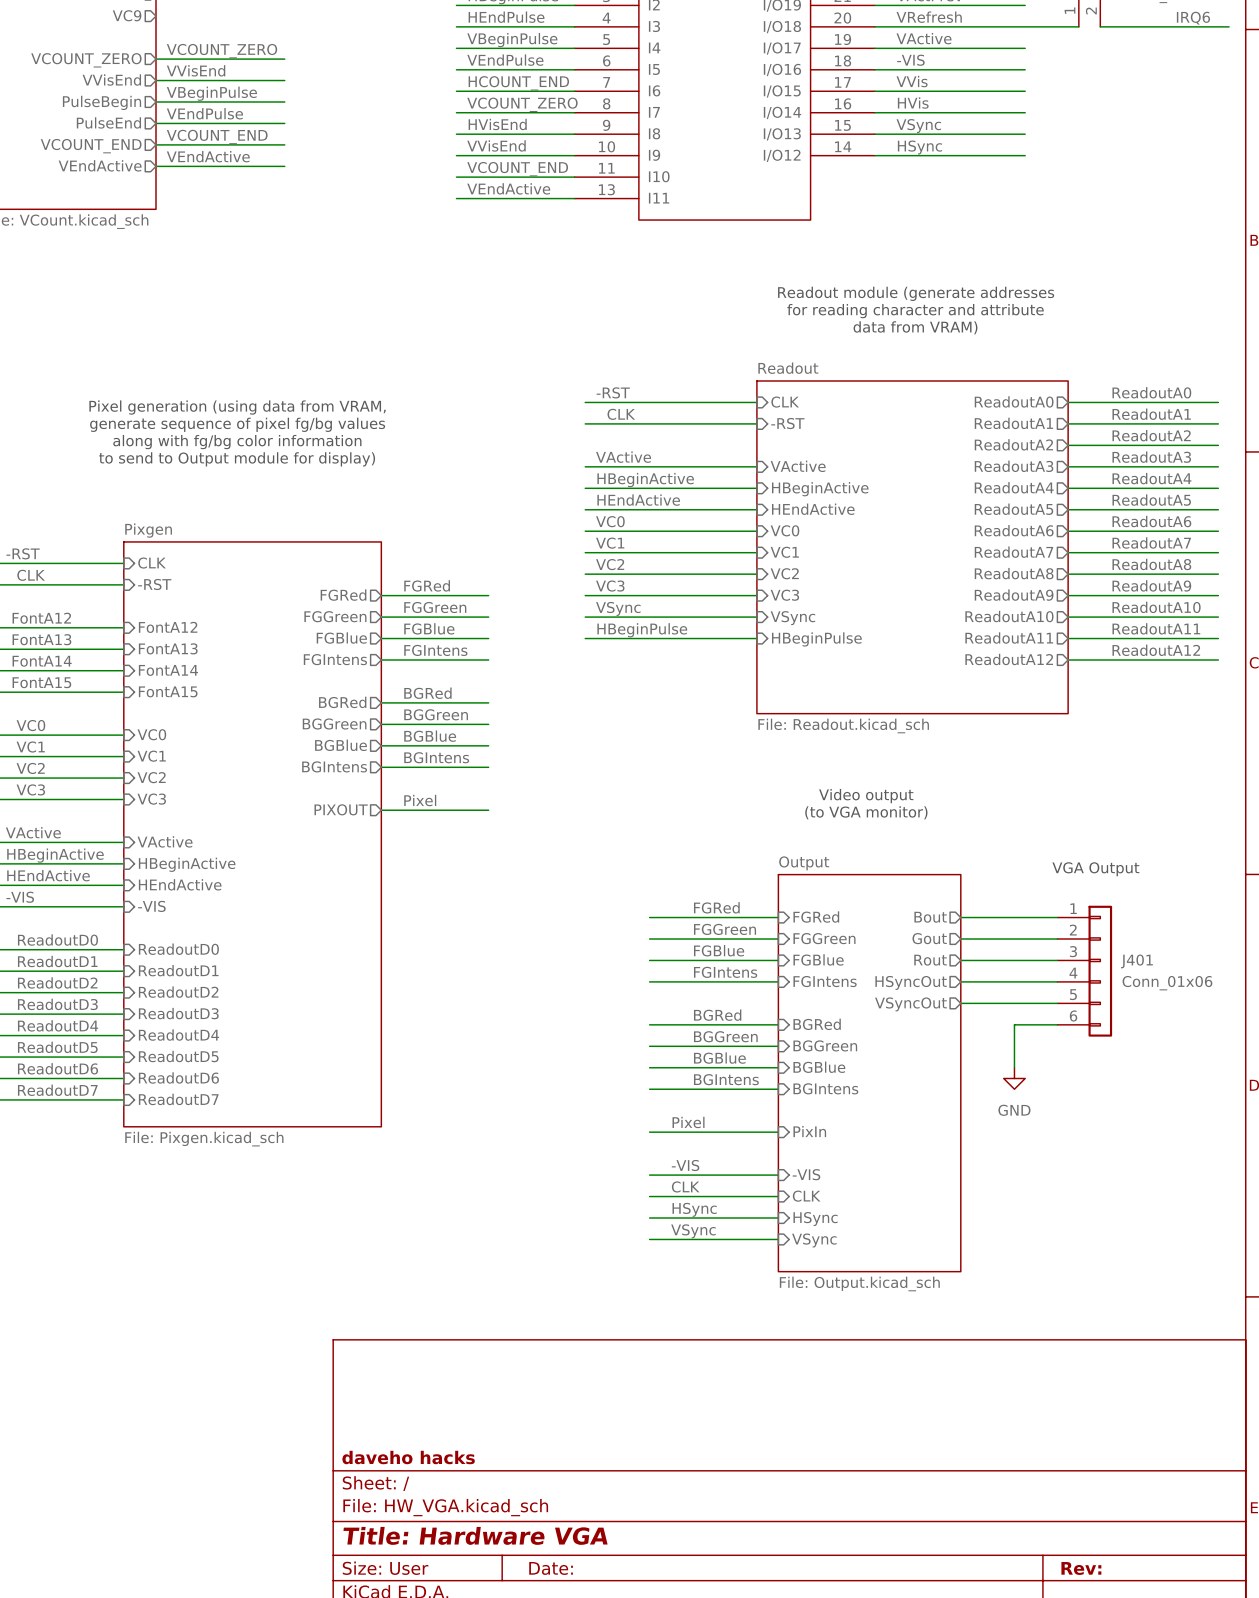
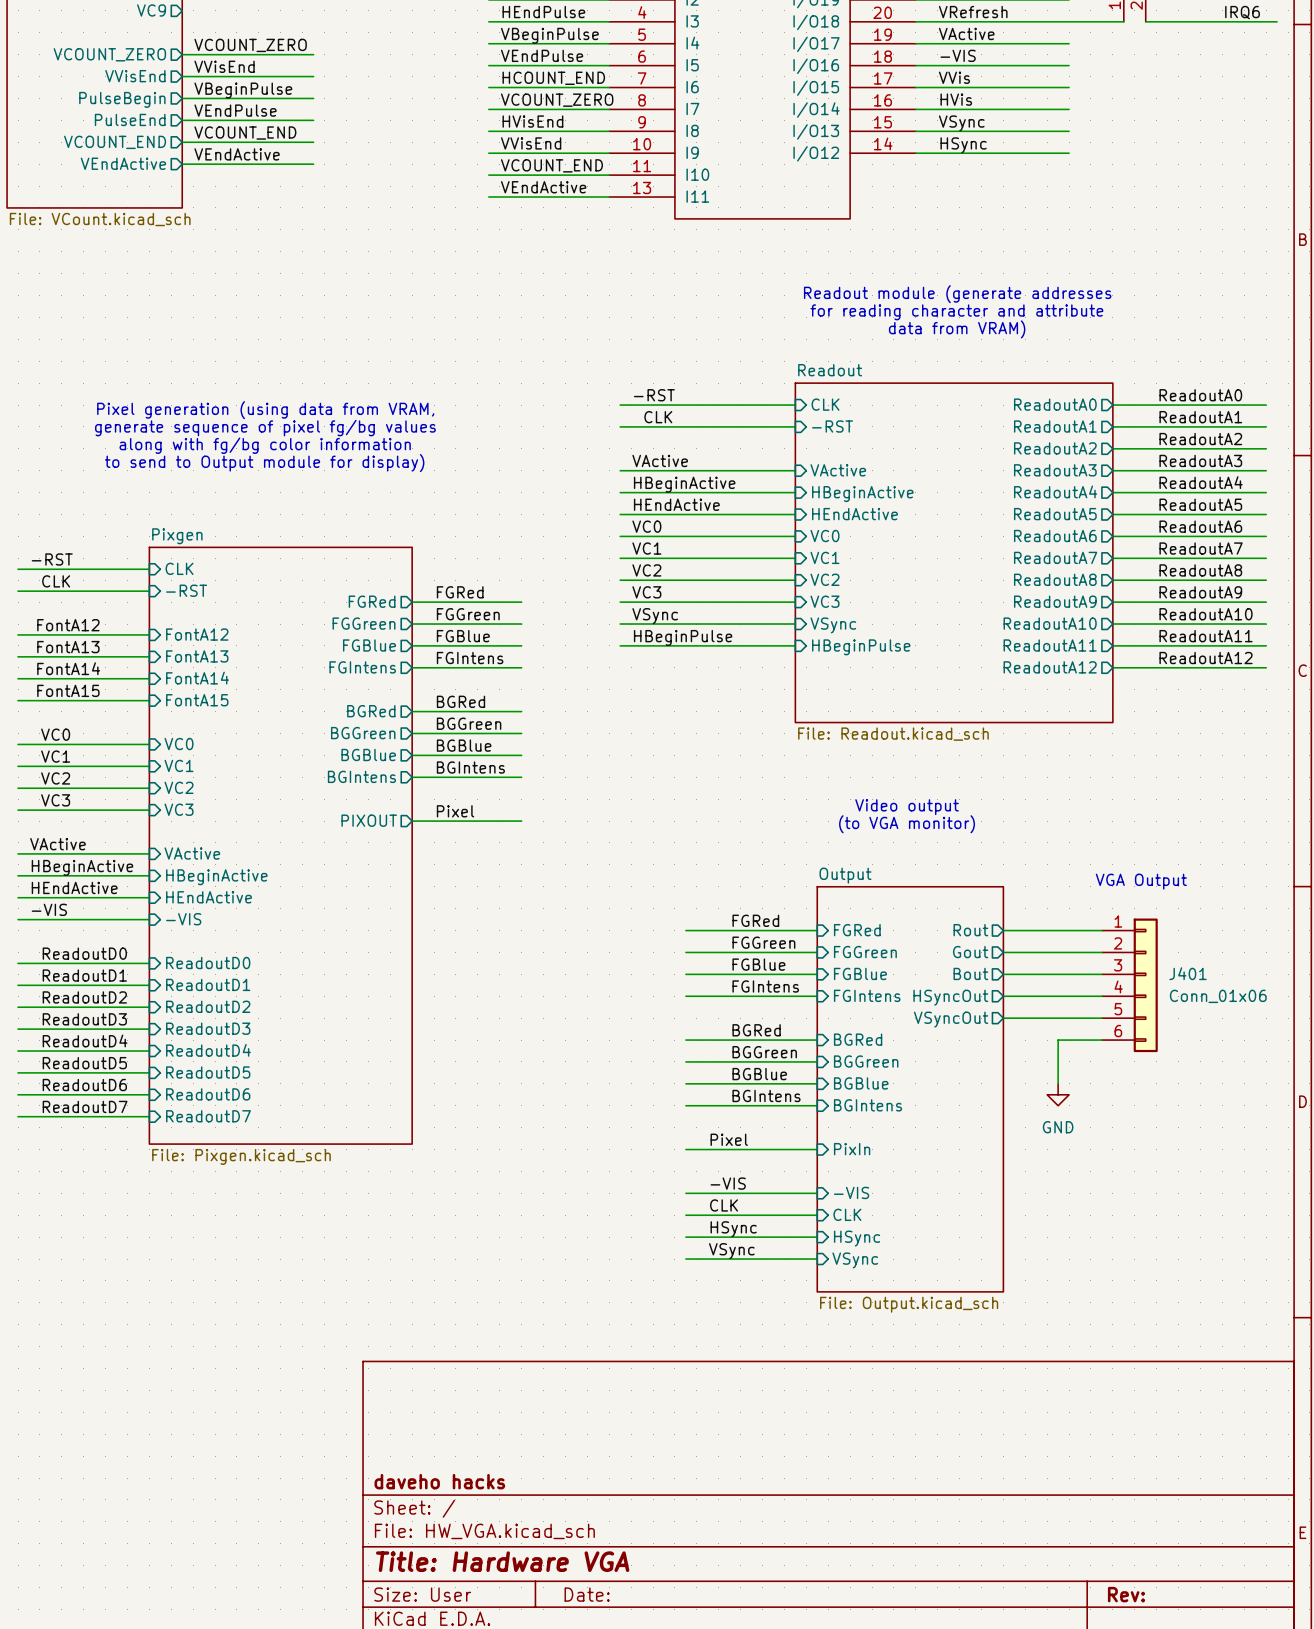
sheet pin: Bout (930, 917) -> Rout (970, 930)
sheet pin: Rout (930, 960) -> Bout (970, 973)

